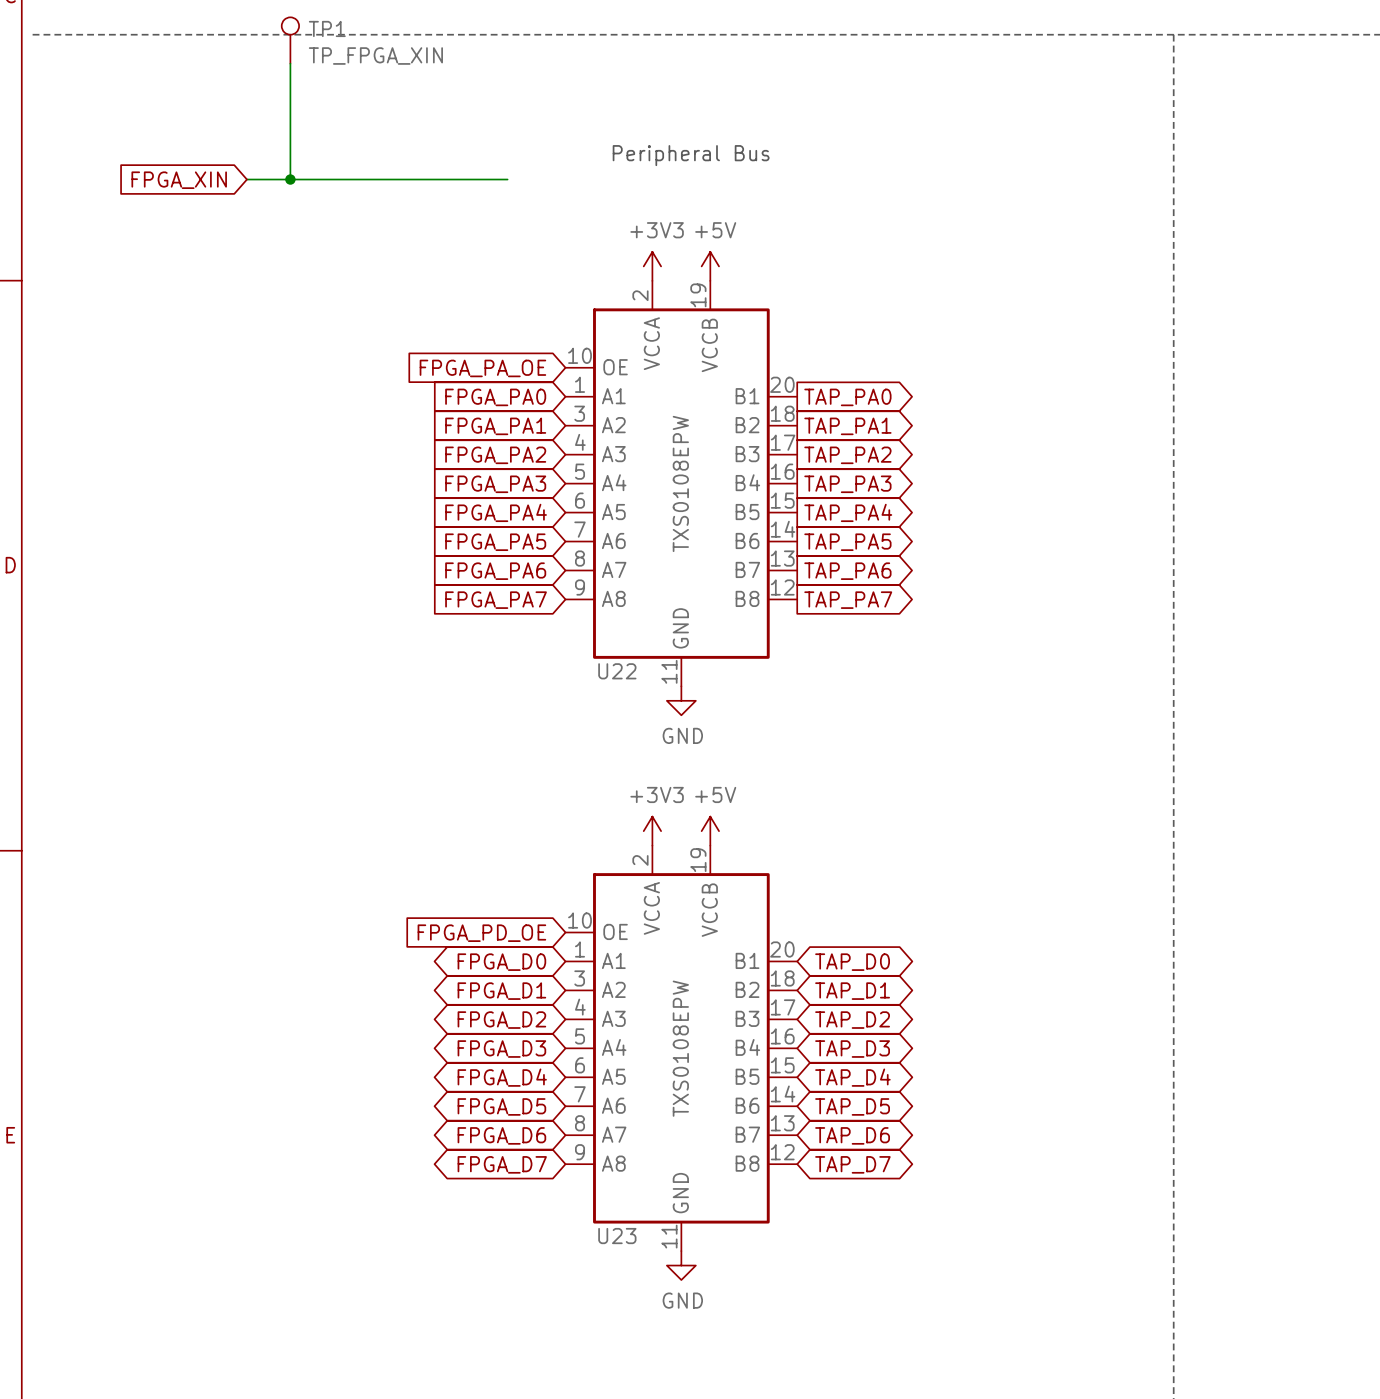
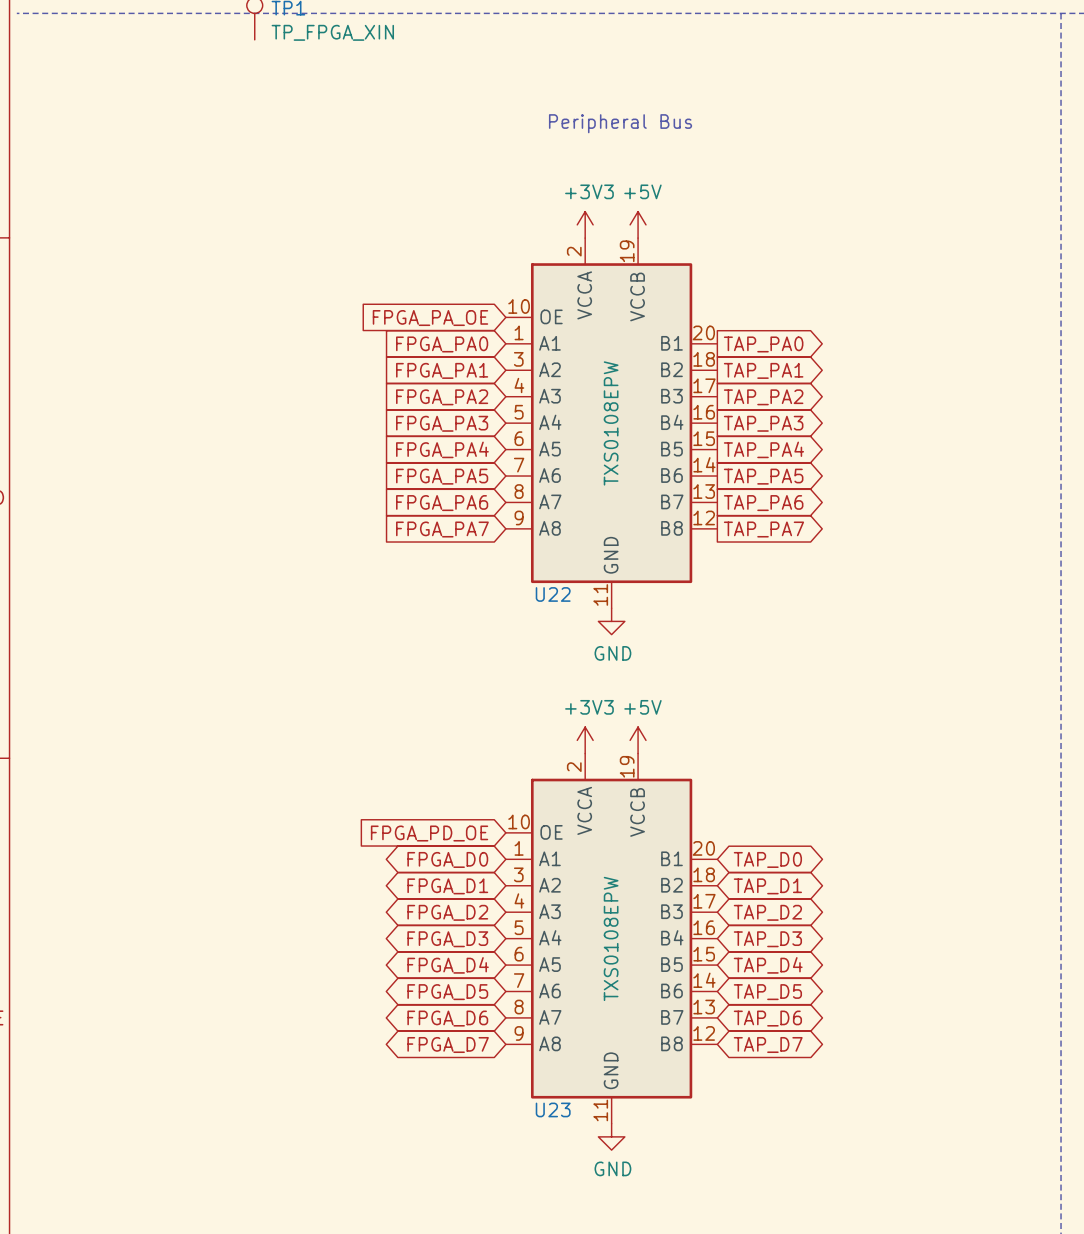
wire: (290, 63) (290, 179) -> none
wire: (246, 179) (507, 179) -> none
junction: (290, 179) -> none
global label: FPGA_XIN (179, 180) -> none

